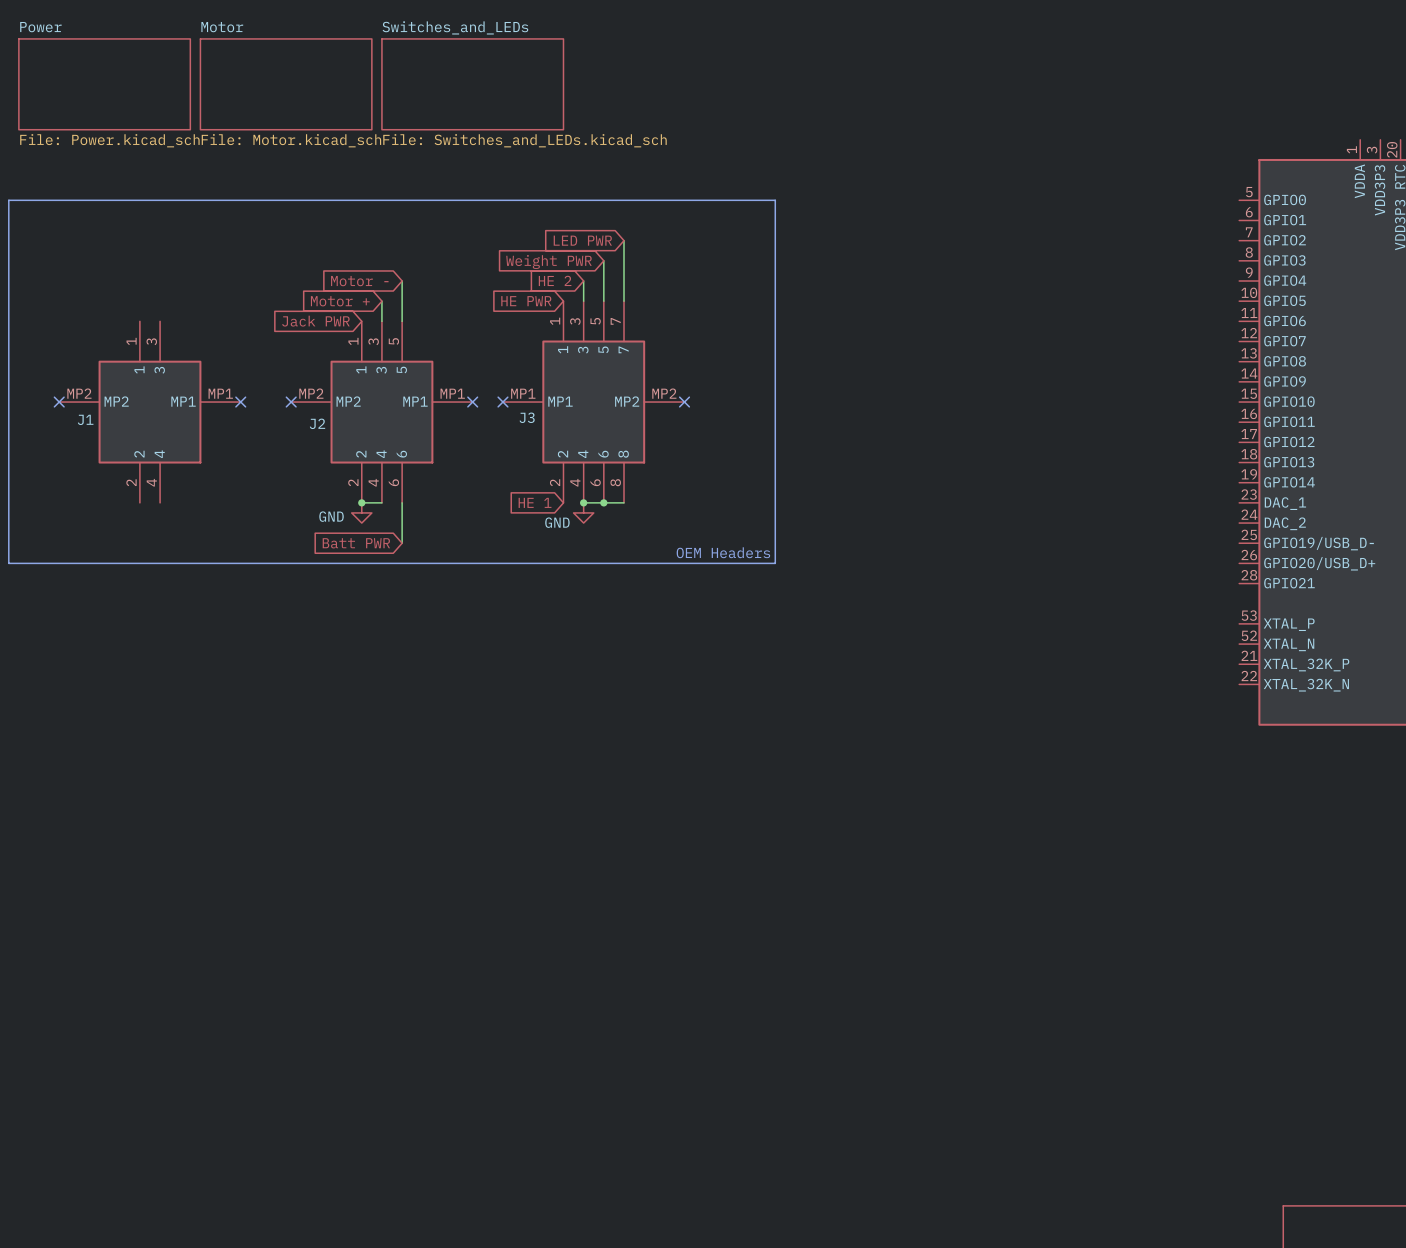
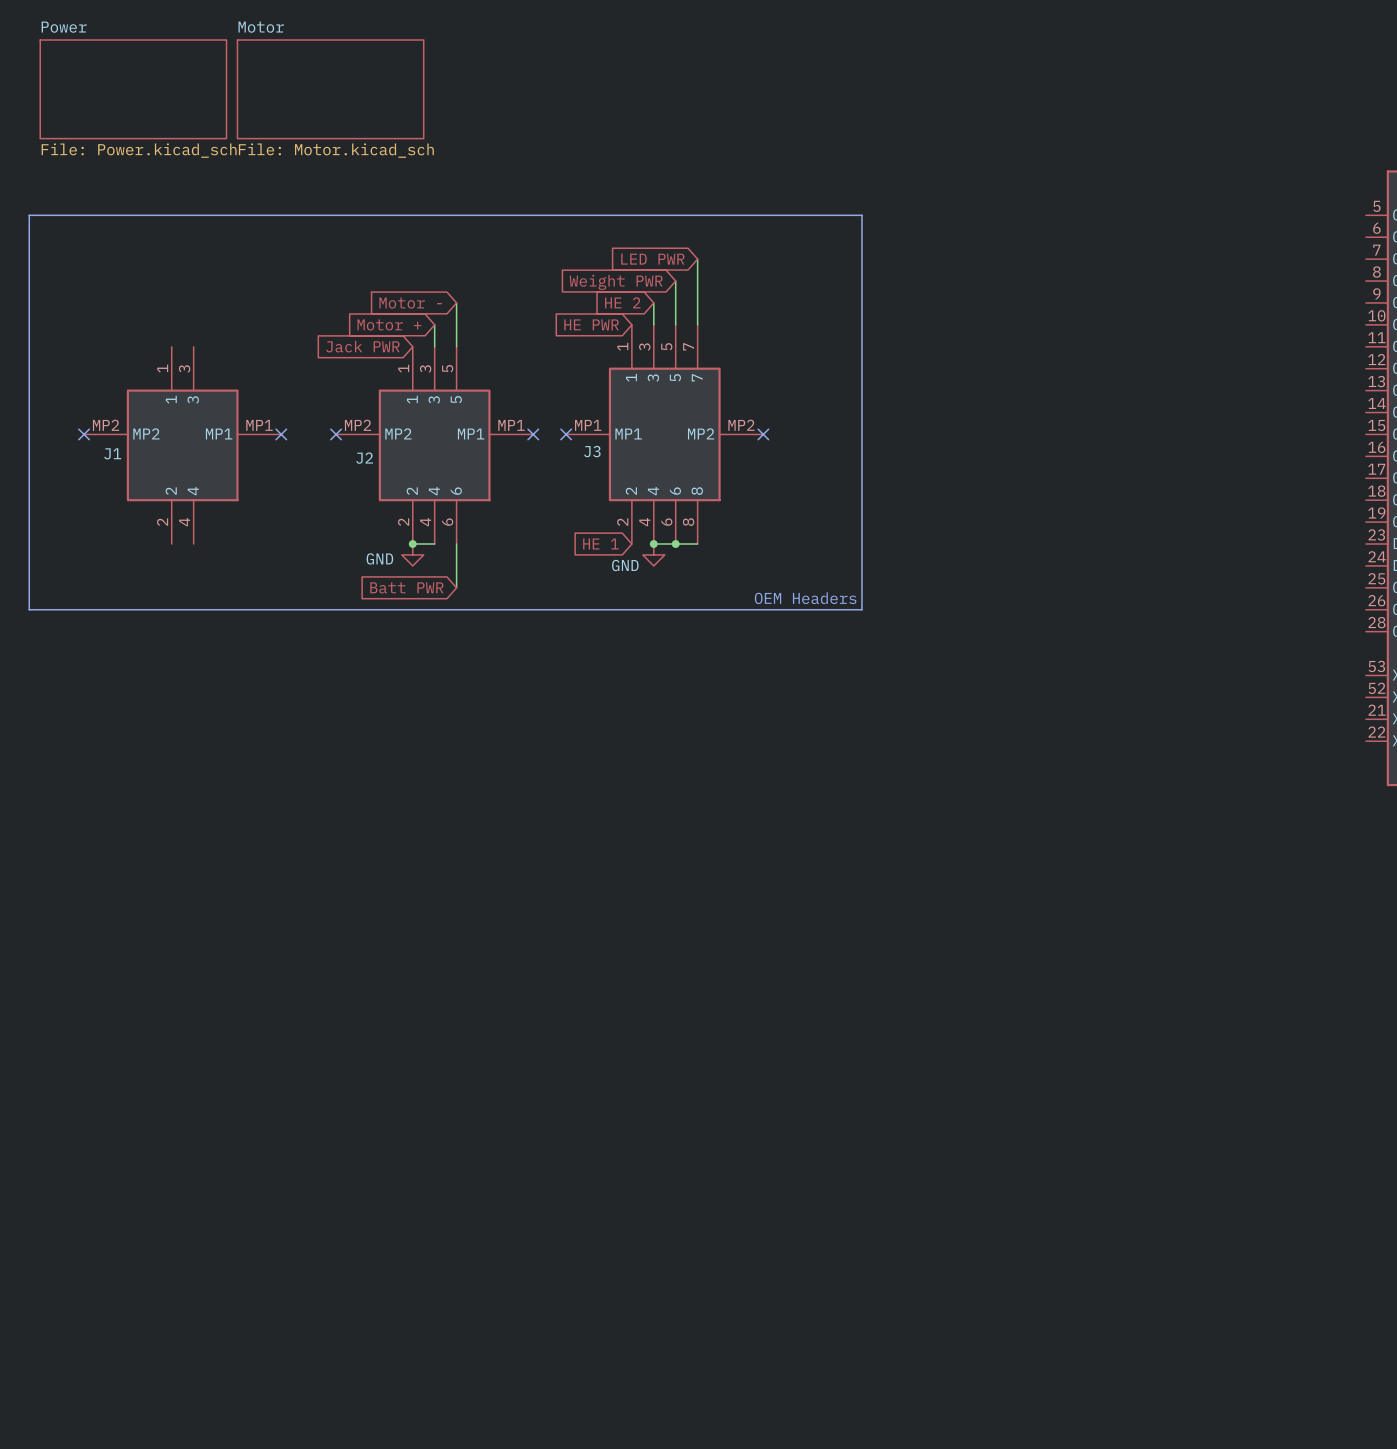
sheet Switches_and_LEDs: File: Switches_and_LEDs.kicad_sch (472, 84) -> none

